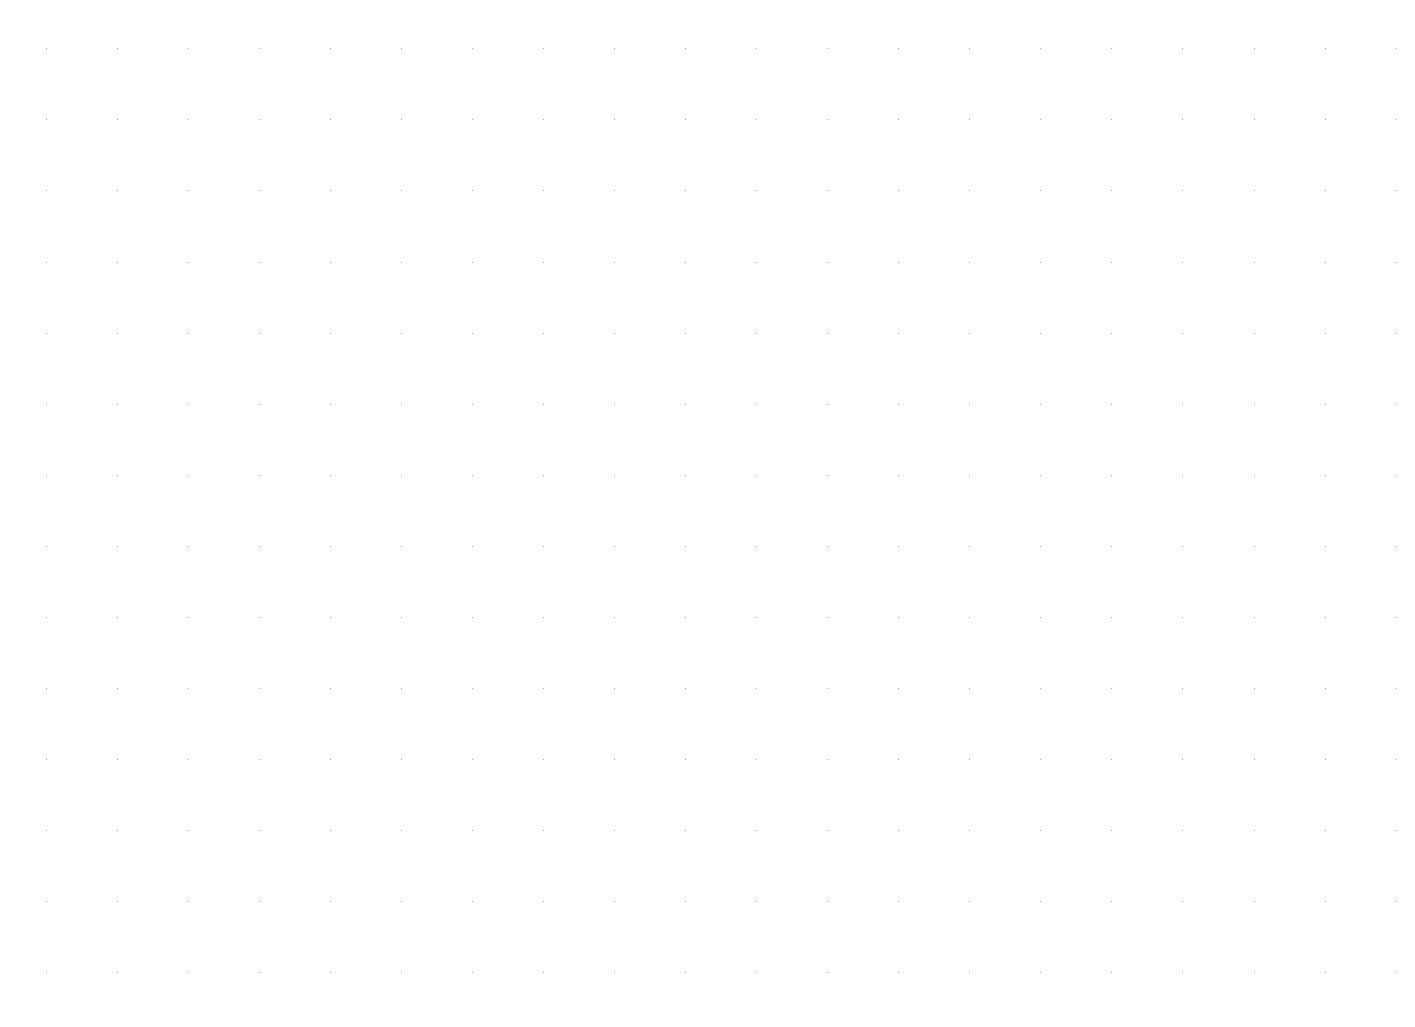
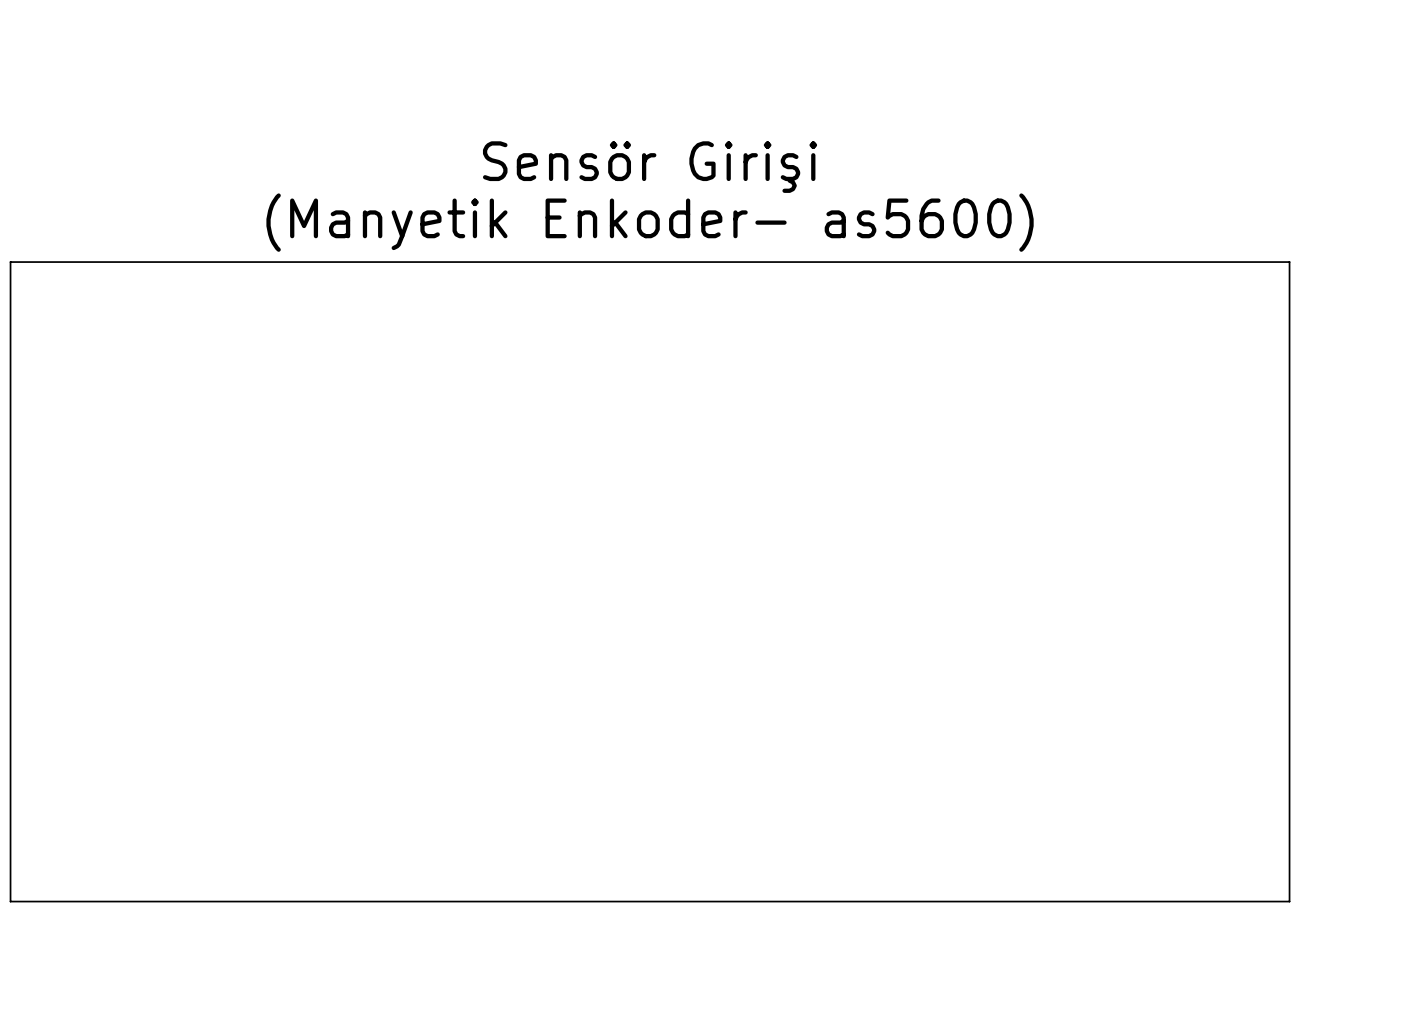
text: none -> Sensör Girişi (650, 167)
text: none -> (Manyetik Enkoder- as5600) (650, 222)
line: none -> (10, 262) (1289, 262) (1289, 901) (10, 901) (10, 262)

